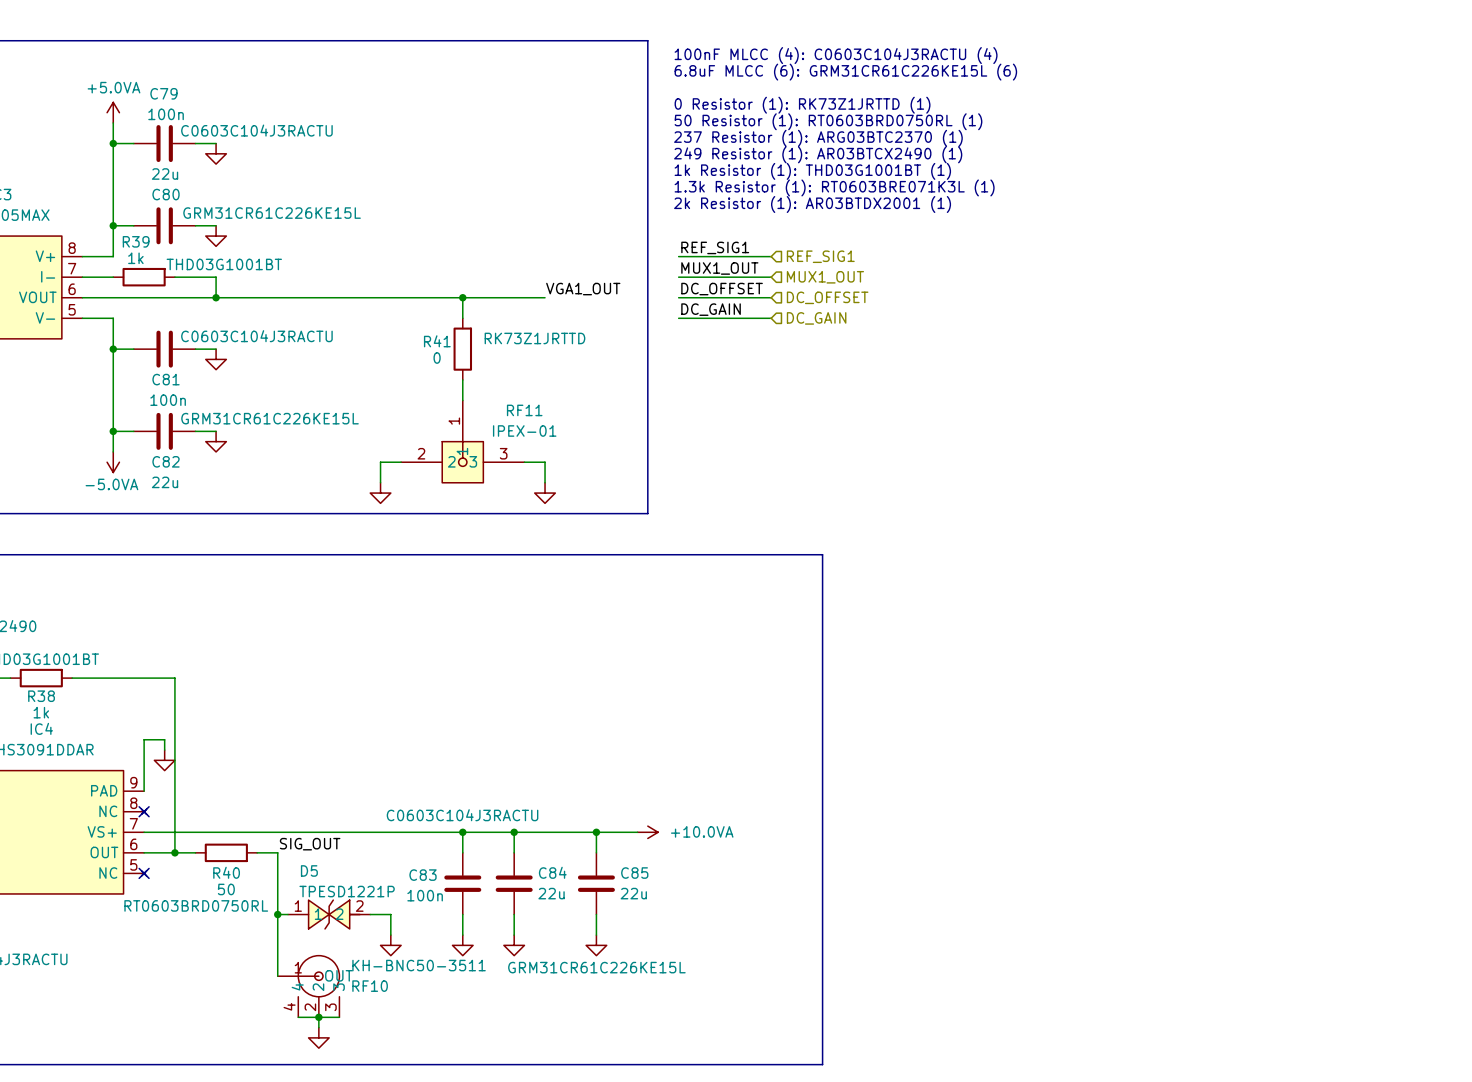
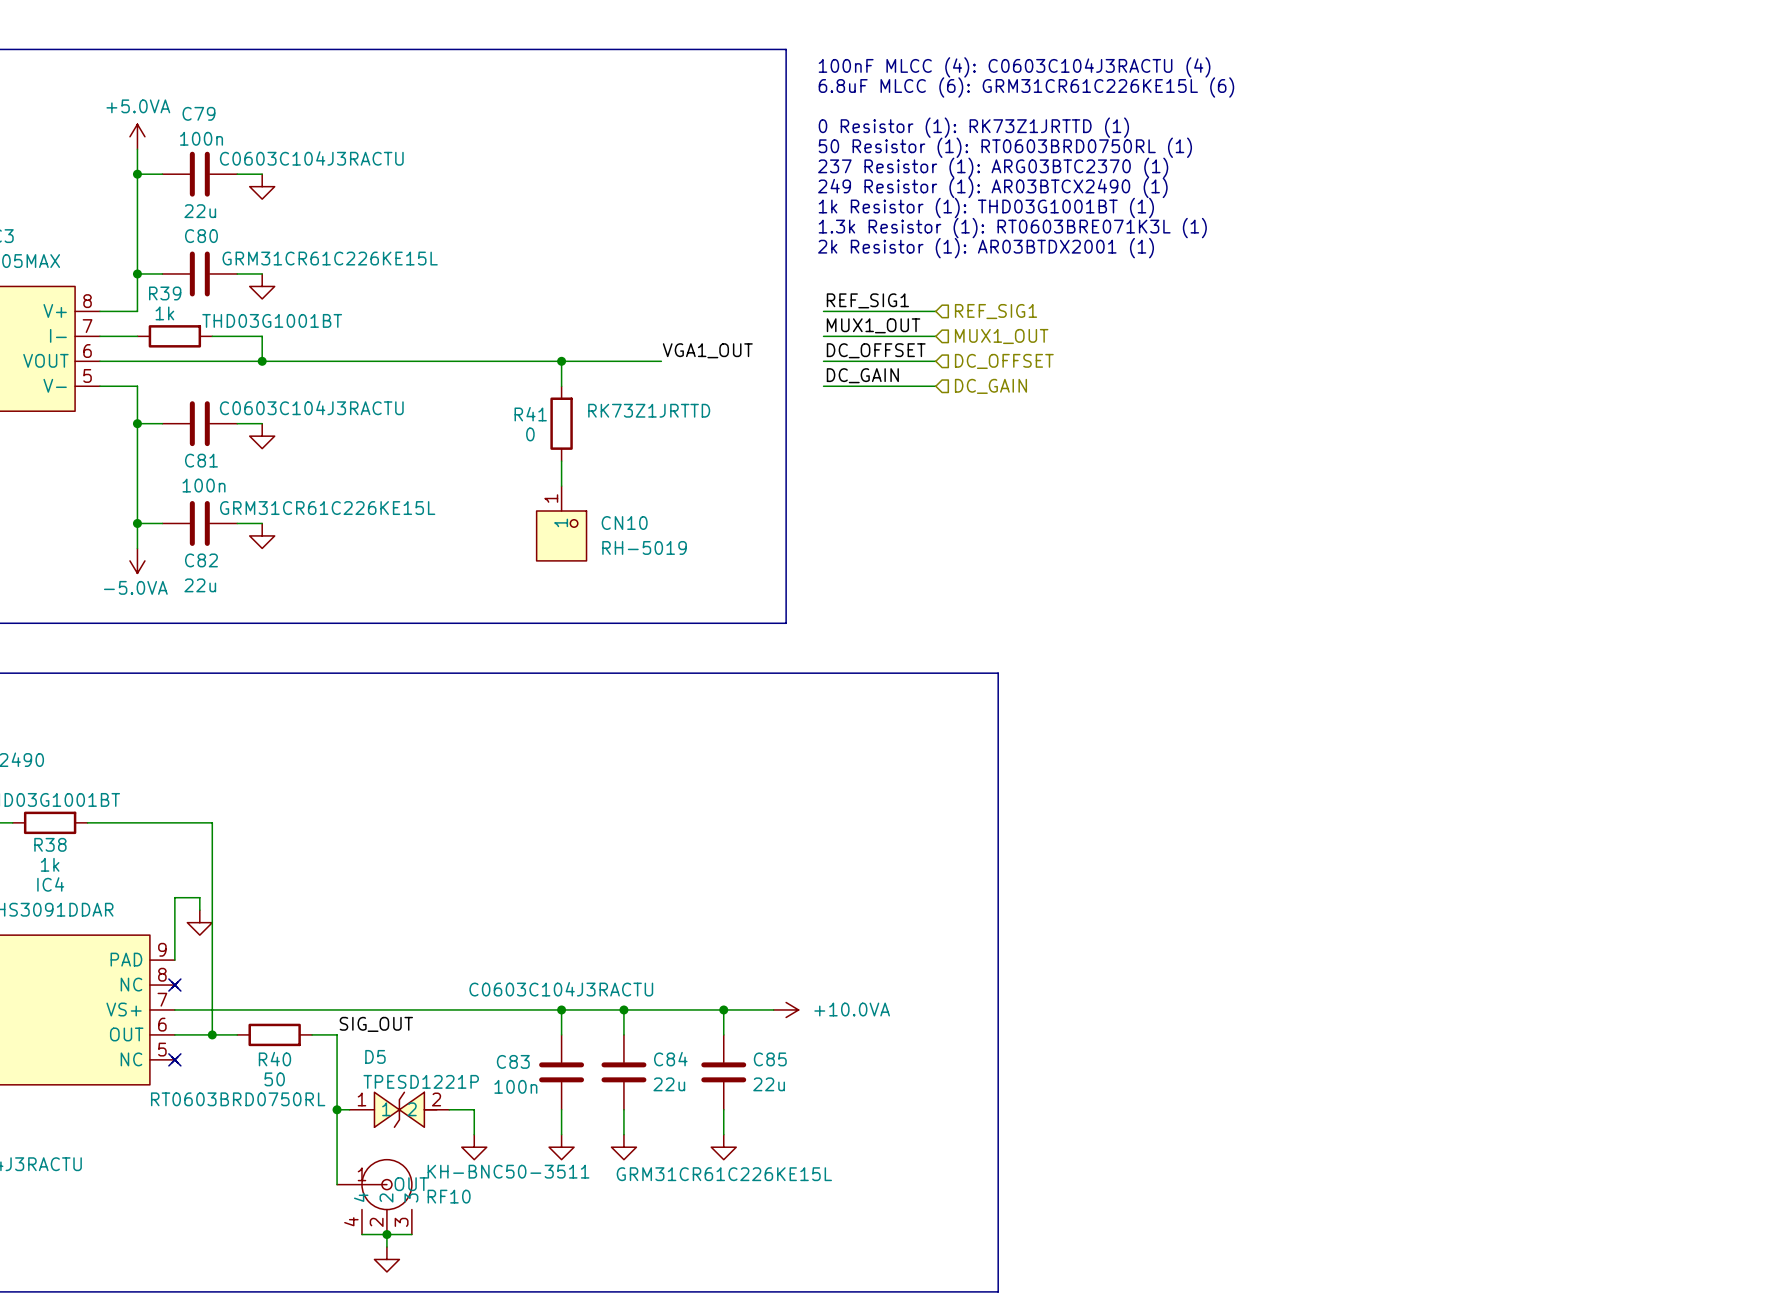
CN10: none -> RH-5019 (561, 523)
RF11: IPEX-01 (462, 441) -> none
wire: (401, 462) (380, 462) (380, 482) -> none
wire: (524, 462) (545, 462) (545, 482) -> none
power symbol: (380, 493) -> none
power symbol: (545, 493) -> none

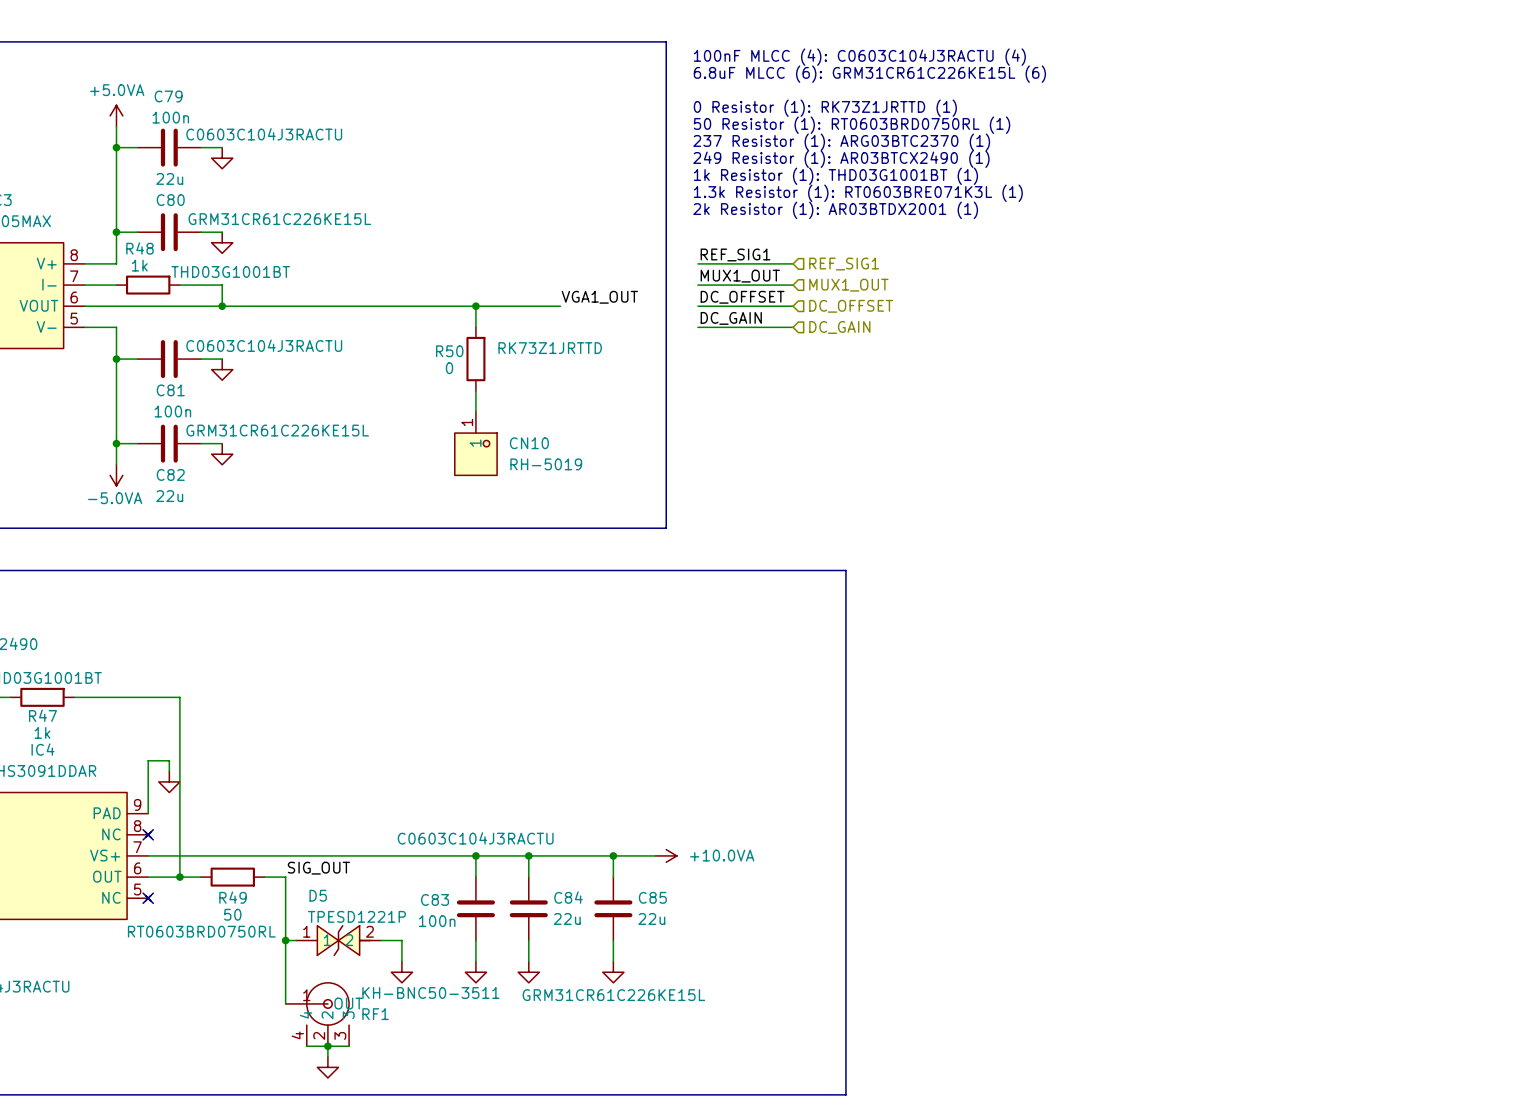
R39 name: R39 (165, 293) -> R48 (139, 248)
R41 name: R41 (530, 414) -> R50 (449, 351)
R38 name: R38 (50, 844) -> R47 (42, 715)
R40 name: R40 (274, 1059) -> R49 (233, 897)
RF10 name: RF10 (449, 1196) -> RF1 (375, 1014)

